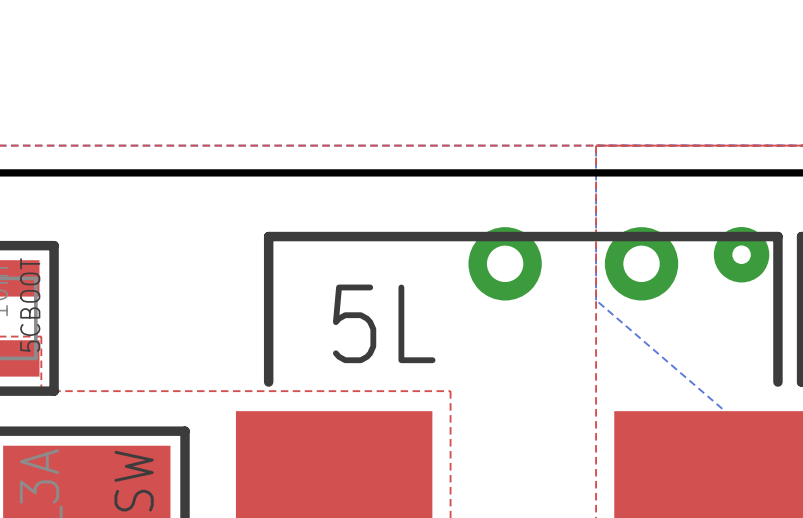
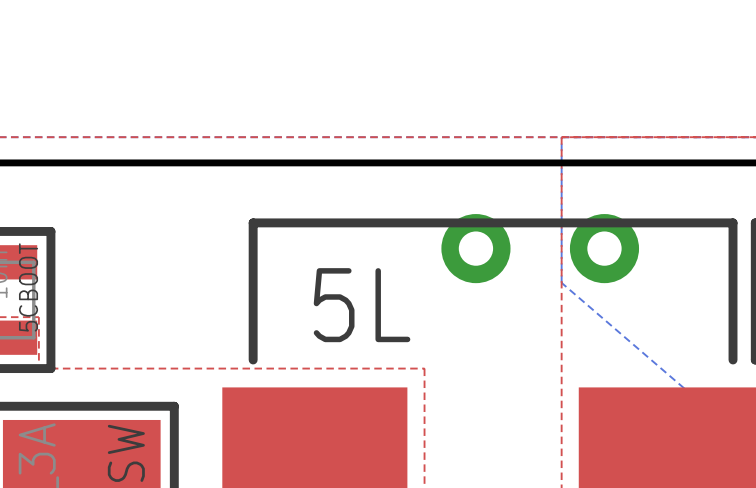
via: (741, 254) -> none

